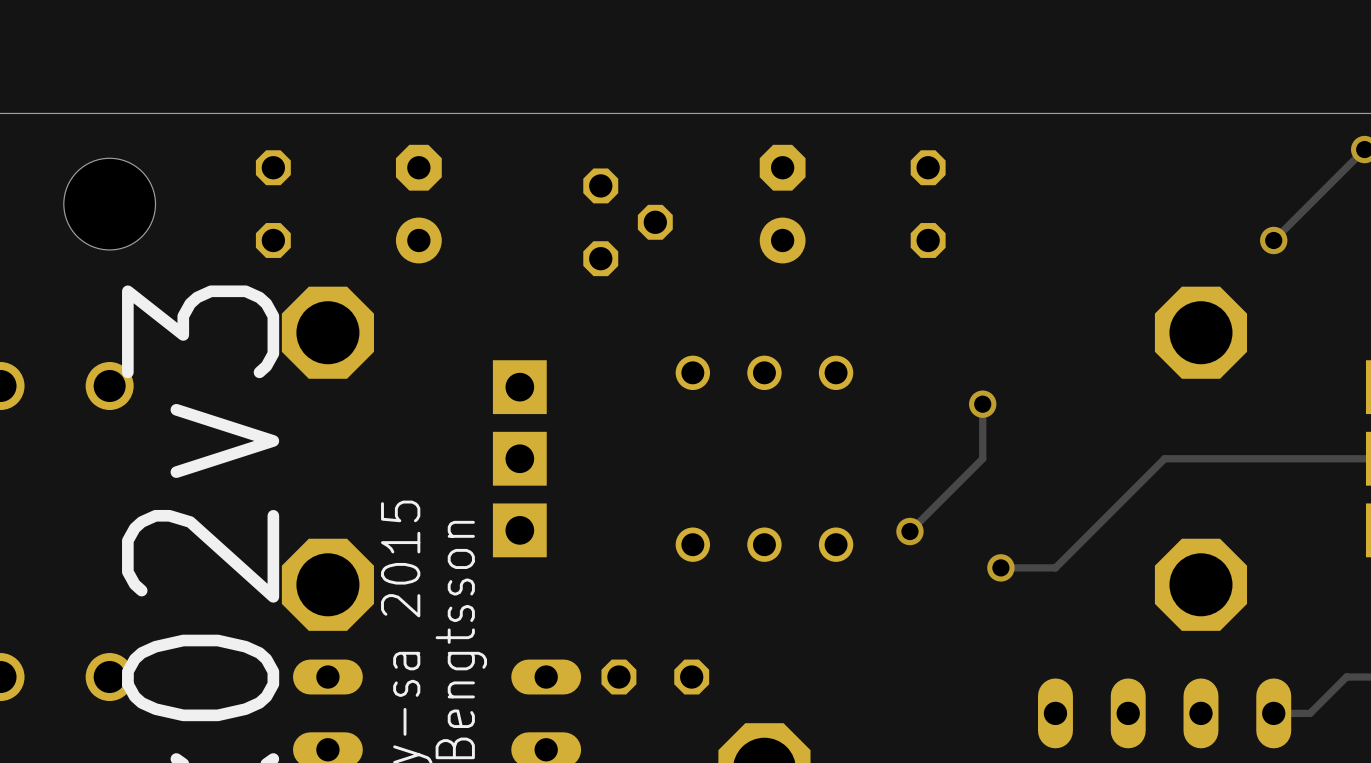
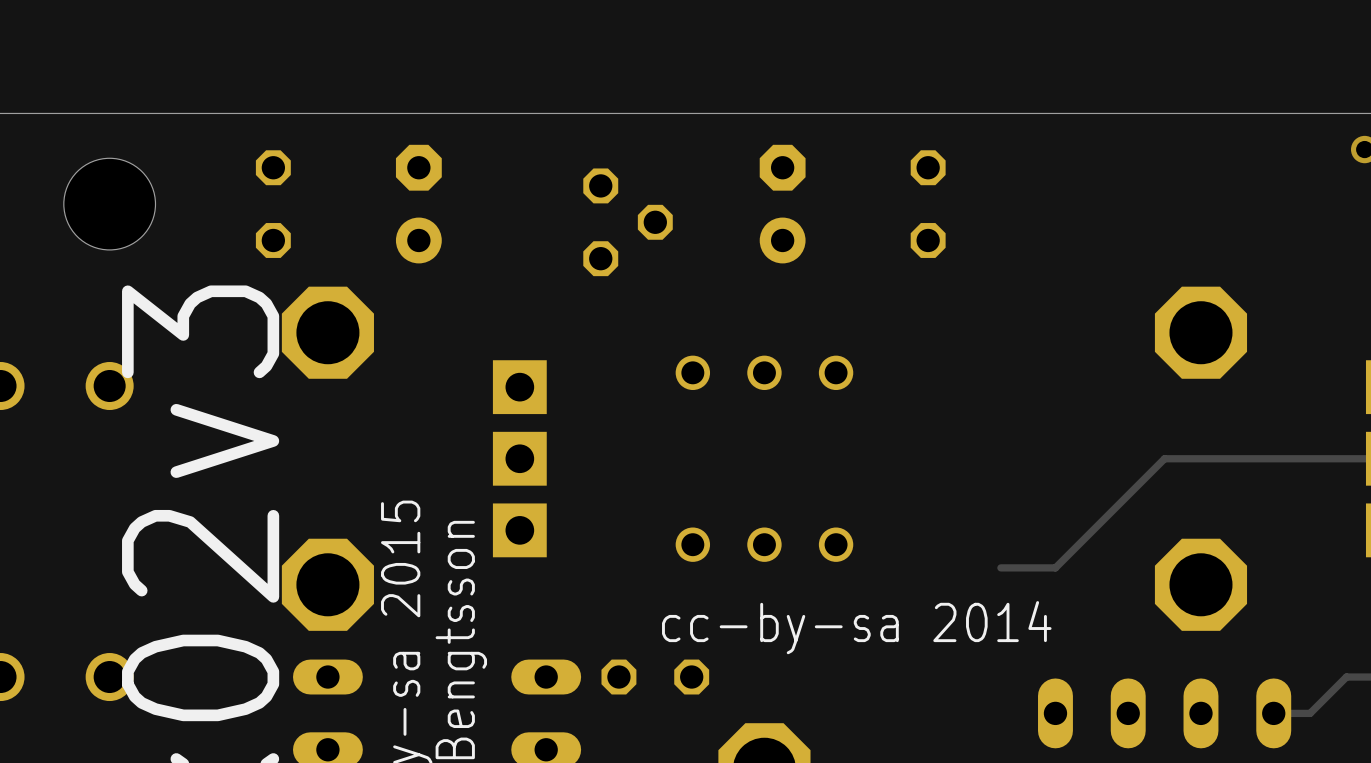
track: (1364, 149) (1273, 240) -> none
via: (1273, 240) -> none
track: (982, 404) (982, 458) (909, 531) -> none
via: (982, 404) -> none
via: (909, 531) -> none
via: (1000, 567) -> none
text: none -> cc-by-sa 2014 (856, 627)

